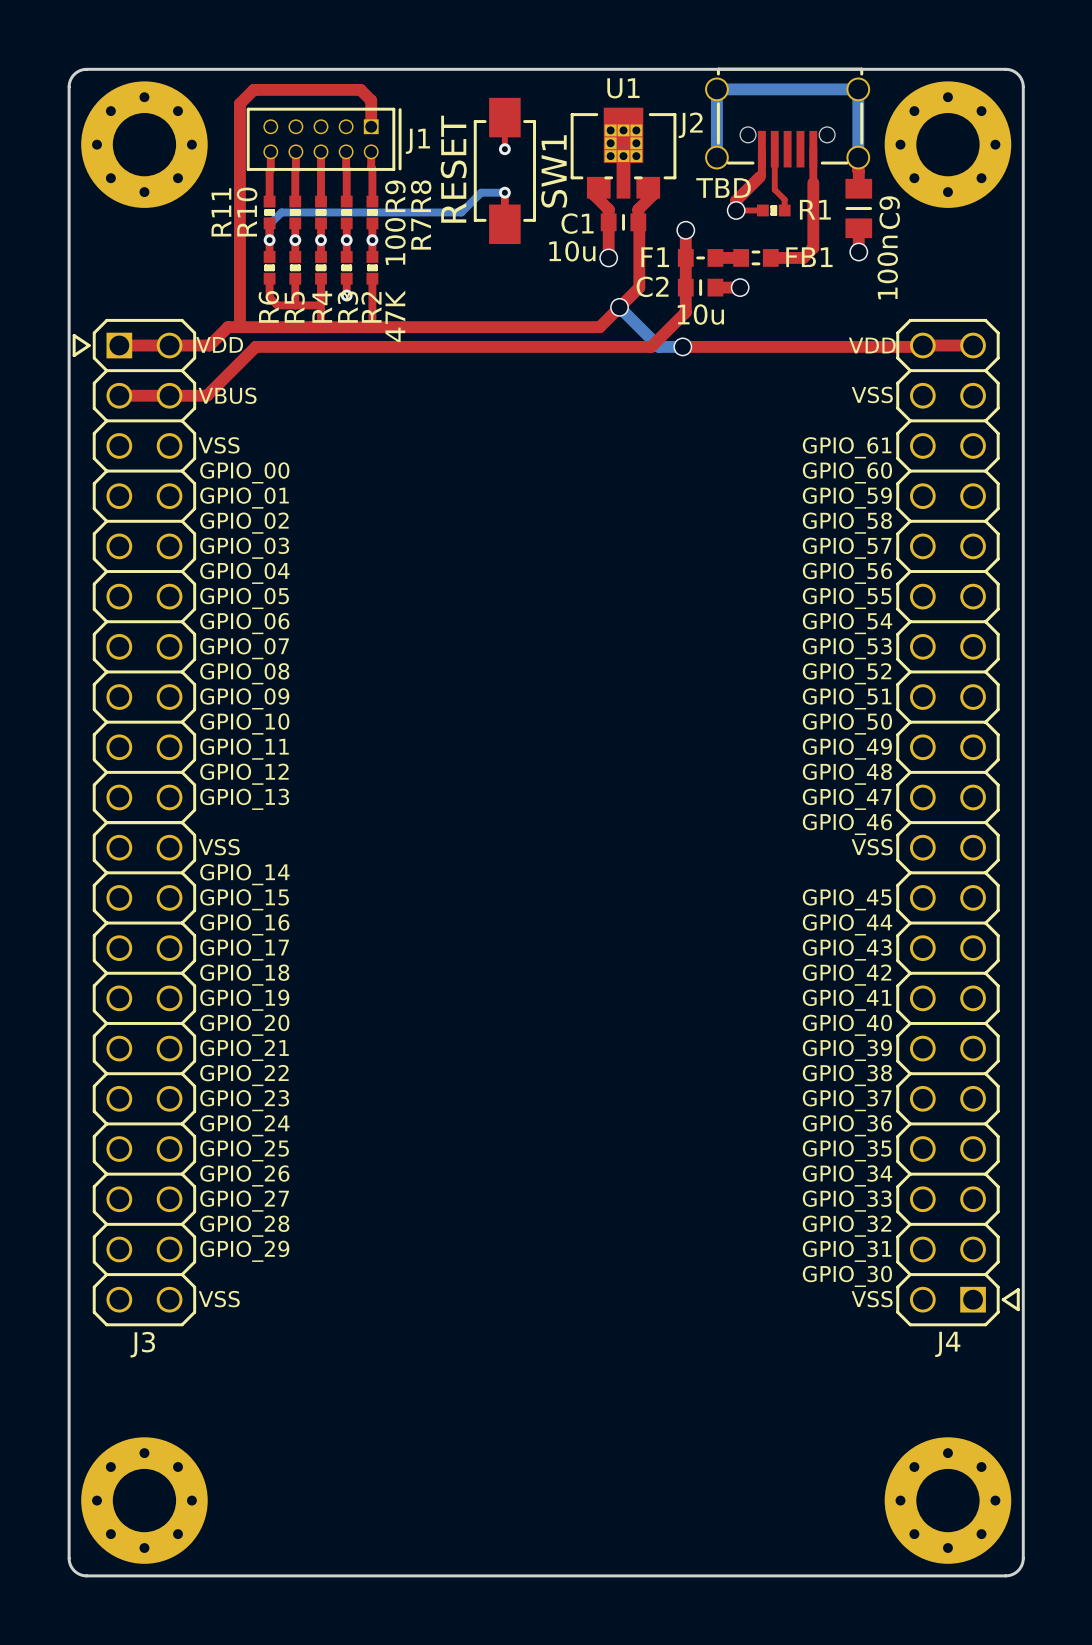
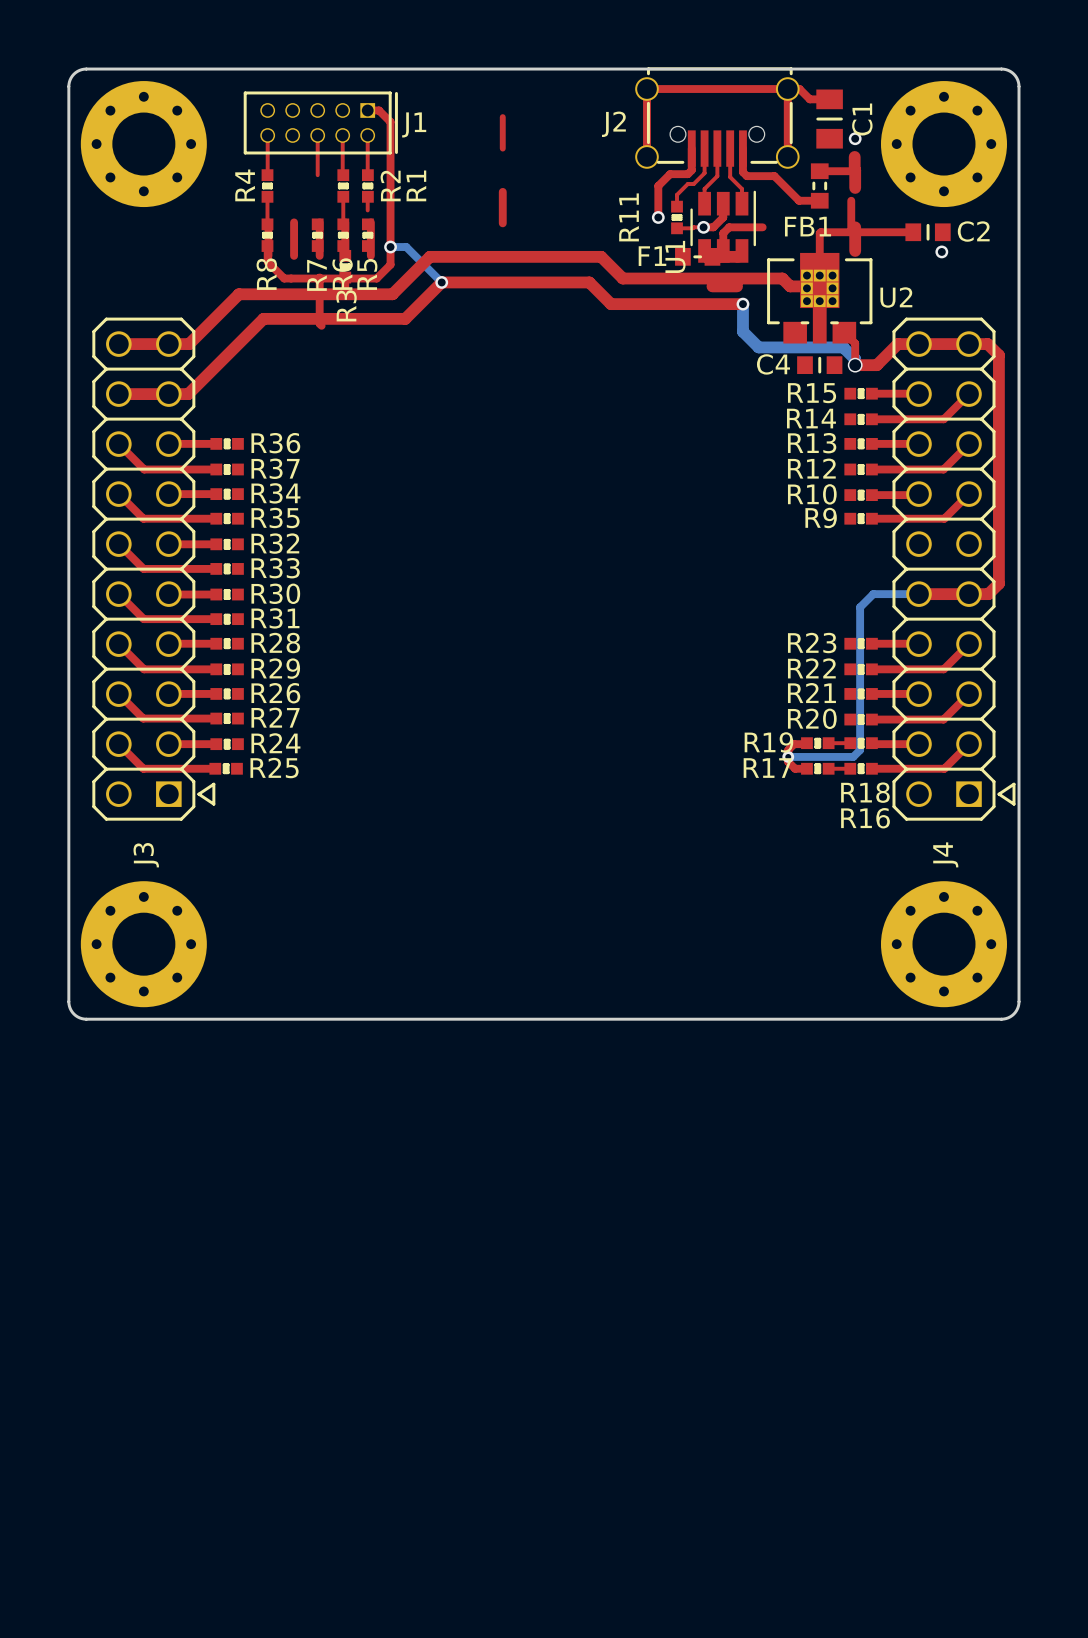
U1 name position: U1 (623, 88) -> U1 (675, 256)
top track: none -> (787, 89) (787, 156)
top track: none -> (829, 99) (809, 99) (799, 89) (646, 89) (646, 156)
U1 footprint: [570, 107, 677, 199] -> [690, 190, 756, 263]
top track: none -> (367, 110) (379, 110) (390, 121) (390, 264) (376, 278) (284, 278) (267, 261) (267, 246)
J2 position: (787, 118) -> (717, 118)
J2 name position: J2 (690, 125) -> J2 (613, 124)
top track: (371, 126) (371, 100) (360, 89) (253, 89) (239, 103) (239, 325) (237, 327) -> none
top track: none -> (267, 135) (267, 175)
top track: none -> (317, 135) (317, 175)
top track: none -> (342, 135) (342, 175)
top track: none -> (367, 135) (367, 175)
J1 position: (324, 139) -> (320, 122)
via: none -> (855, 138)
via: (504, 149) -> none
top track: none -> (691, 148) (691, 170) (687, 174) (670, 174) (658, 185) (658, 217)
top track: none -> (704, 148) (704, 173) (693, 184) (687, 184) (677, 194) (677, 206)
top track: none -> (717, 148) (717, 176) (704, 188) (704, 203)
top track: none -> (730, 148) (730, 177) (741, 188) (741, 203)
top track: none -> (742, 148) (742, 172) (746, 176) (774, 176) (799, 200) (819, 200)
top track: (761, 149) (761, 174) (736, 200) (736, 210) (762, 210) -> none
top track: (774, 149) (774, 189) (784, 199) (784, 210) -> none
top track: (813, 149) (813, 248) (803, 257) (770, 257) -> none
top track: (270, 151) (269, 201) -> none
top track: (295, 151) (295, 201) -> none
top track: (321, 151) (321, 201) -> none
top track: (346, 151) (346, 201) -> none
top track: (371, 151) (372, 201) -> none
bottom track: (716, 157) (716, 89) (858, 89) (858, 157) -> none
SW1: RESET (504, 170) -> none
top track: none -> (819, 171) (851, 171)
top track: (593, 187) (593, 194) (608, 209) (608, 257) -> none
top track: (653, 187) (653, 194) (638, 209) (639, 287) (599, 327) (228, 327) (209, 345) (189, 345) -> (819, 286) (790, 286) (782, 278) (622, 278) (601, 256) (429, 256) (392, 294) (238, 294) (189, 344)
R1 value: TBD (723, 188) -> none
bottom track: (504, 192) (481, 192) (461, 212) (281, 212) (269, 224) (269, 240) -> none
via: (504, 192) -> none
R9 name position: R9 (395, 196) -> R9 (821, 518)
R8 name position: R8 (421, 196) -> R8 (266, 274)
top track: none -> (267, 196) (267, 224)
top track: none -> (343, 196) (343, 224)
top track: none -> (367, 196) (367, 210)
top track: none -> (851, 200) (850, 232)
top track: none -> (723, 203) (723, 217) (713, 227) (677, 228)
C9: 100n (858, 208) -> none
via: (736, 210) -> none
R1 rotation: 0° (773, 210) -> 90° clockwise (367, 185)
R1 position: (773, 210) -> (367, 185)
R11 position: (269, 212) -> (677, 217)
R10 rotation: 0° (295, 212) -> 90° clockwise (861, 495)
R10 position: (295, 212) -> (861, 495)
R9 rotation: 0° (321, 212) -> 90° clockwise (861, 518)
R9 position: (321, 212) -> (861, 518)
R8 position: (346, 212) -> (267, 235)
R7 position: (372, 212) -> (317, 235)
C1 footprint: [600, 213, 647, 232] -> [816, 89, 843, 149]
via: none -> (658, 217)
C1 name position: C1 (577, 223) -> C1 (862, 119)
via: none -> (703, 227)
top track: none -> (762, 227) (729, 227) (723, 233) (723, 250)
top track: (685, 230) (685, 312) (651, 346) (255, 346) (206, 395) (189, 395) -> (742, 304) (611, 304) (589, 282) (441, 282) (405, 318) (263, 318) (188, 394)
via: (685, 230) -> none
top track: none -> (913, 232) (820, 232) (819, 280)
R7 name position: R7 (421, 234) -> R7 (316, 275)
via: (269, 240) -> none
via: (295, 240) -> none
via: (321, 240) -> none
via: (346, 240) -> none
via: (372, 240) -> none
R7 value: 100 (395, 241) -> none
bottom track: none -> (390, 247) (406, 247) (441, 282)
via: none -> (390, 247)
C1 value: 10u (572, 251) -> none
via: (858, 252) -> none
via: none -> (941, 251)
via: (608, 257) -> none
FB1 rotation: 0° (755, 257) -> 90° clockwise (819, 185)
FB1 position: (755, 257) -> (819, 185)
R6 position: (269, 267) -> (343, 235)
R5 position: (295, 267) -> (367, 235)
R4 position: (321, 267) -> (267, 185)
R2 position: (372, 267) -> (343, 185)
top track: (269, 278) (269, 297) (277, 305) (319, 305) (321, 307) -> none
top track: (295, 278) (295, 305) -> none
top track: (372, 278) (372, 327) -> none
via: none -> (441, 282)
C2 name position: C2 (652, 286) -> C2 (973, 231)
C2 position: (700, 287) -> (928, 232)
via: (740, 287) -> none
via: (346, 295) -> none
U2: none -> (819, 298)
bottom track: none -> (742, 304) (742, 331) (758, 347) (843, 347) (855, 359) (855, 365)
via: none -> (742, 304)
R4 name position: R4 (322, 306) -> R4 (245, 185)
R2 name position: R2 (371, 307) -> R2 (390, 186)
bottom track: (619, 307) (659, 346) (682, 346) -> none
via: (619, 307) -> none
C2 value: 10u (700, 314) -> none
R2 value: 47K (395, 316) -> none
J3 footprint: [72, 318, 197, 1327] -> [92, 317, 216, 821]
J4 footprint: [896, 318, 1020, 1327] -> [892, 317, 1016, 821]
top track: (922, 345) (682, 346) -> (918, 344) (897, 344) (876, 365) (855, 365) (855, 343) (844, 332)
top track: none -> (969, 344) (987, 344) (998, 355) (998, 583) (988, 594) (918, 594)
via: (682, 346) -> none
C4: none -> (819, 365)
via: none -> (855, 365)
R15: none -> (861, 393)
top track: none -> (871, 393) (918, 394)
top track: none -> (969, 394) (943, 419) (871, 419)
R14: none -> (861, 419)
top track: none -> (118, 444) (144, 469) (216, 469)
top track: none -> (169, 443) (216, 443)
R36: none -> (227, 443)
R13: none -> (861, 443)
top track: none -> (871, 443) (918, 443)
top track: none -> (969, 444) (943, 469) (871, 469)
R37: none -> (227, 469)
R12: none -> (861, 469)
top track: none -> (118, 494) (143, 518) (216, 518)
top track: none -> (168, 494) (216, 494)
R34: none -> (227, 494)
top track: none -> (918, 494) (871, 495)
top track: none -> (969, 494) (944, 518) (871, 518)
R35: none -> (227, 518)
top track: none -> (118, 544) (143, 568) (216, 568)
top track: none -> (169, 544) (216, 544)
R32: none -> (227, 544)
R33: none -> (227, 568)
top track: none -> (118, 594) (143, 619) (216, 619)
top track: none -> (168, 594) (216, 594)
bottom track: none -> (918, 594) (873, 594) (860, 607) (860, 750) (853, 756) (788, 756)
R30: none -> (227, 594)
R31: none -> (227, 619)
top track: none -> (118, 644) (144, 669) (216, 669)
top track: none -> (216, 643) (168, 644)
R28: none -> (227, 643)
R23: none -> (861, 643)
top track: none -> (871, 643) (918, 644)
top track: none -> (969, 644) (943, 669) (871, 669)
R29: none -> (227, 669)
R22: none -> (861, 669)
top track: none -> (169, 693) (216, 693)
R26: none -> (227, 693)
R21: none -> (861, 693)
top track: none -> (871, 693) (918, 693)
top track: none -> (118, 694) (143, 718) (216, 718)
top track: none -> (969, 694) (943, 719) (871, 719)
R27: none -> (227, 718)
R20: none -> (861, 719)
R19: none -> (817, 743)
top track: none -> (828, 743) (850, 743)
R18: none -> (861, 743)
top track: none -> (118, 744) (143, 768) (216, 768)
top track: none -> (168, 744) (216, 744)
R24: none -> (227, 744)
top track: none -> (804, 744) (794, 744) (788, 750) (788, 761) (795, 768) (804, 768)
top track: none -> (871, 744) (918, 744)
top track: none -> (969, 744) (944, 768) (871, 768)
via: none -> (788, 756)
R25: none -> (226, 768)
R17: none -> (817, 768)
top track: none -> (828, 768) (850, 768)
R16: none -> (861, 768)
part: none -> (143, 944)
part: none -> (943, 944)
board edge: (69, 1005) (69, 1558) (71, 1567) (77, 1573) (86, 1575) (1005, 1575) (1018, 1570) (1023, 1558) (1023, 1005) -> (68, 1001) (73, 1014) (86, 1019) (1001, 1019) (1013, 1014) (1019, 1001)
J3 name position: J3 (142, 1344) -> J3 (146, 855)
J4 name position: J4 (947, 1344) -> J4 (945, 854)
part: (144, 1500) -> none
part: (947, 1500) -> none

